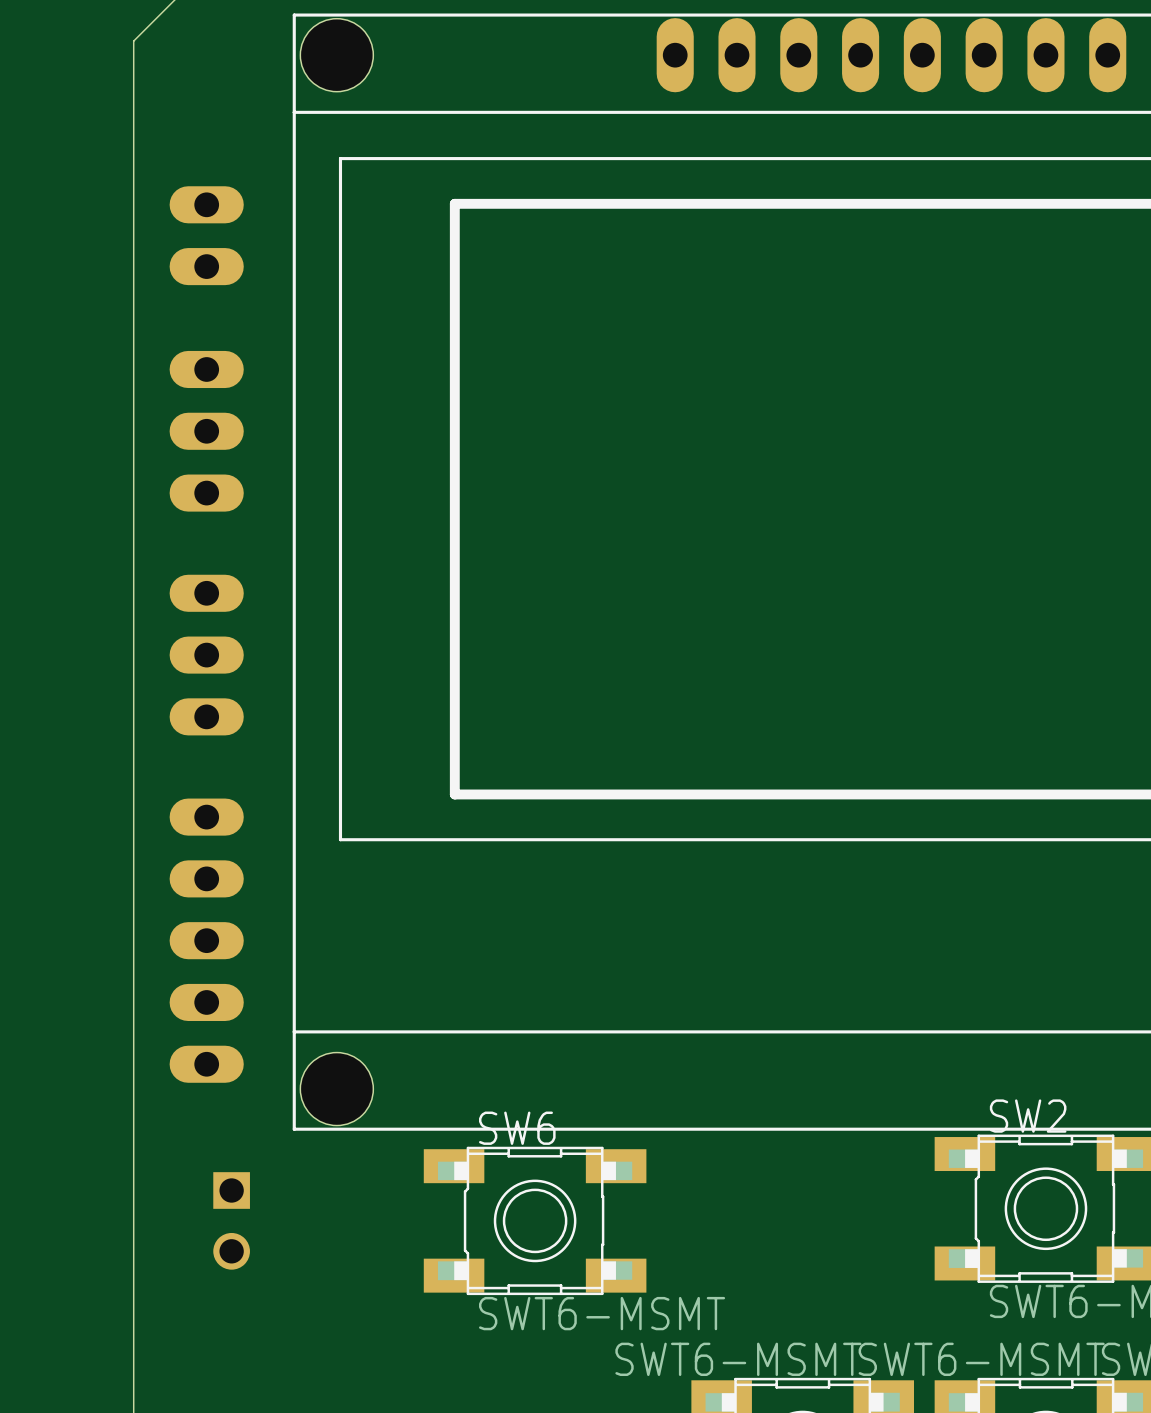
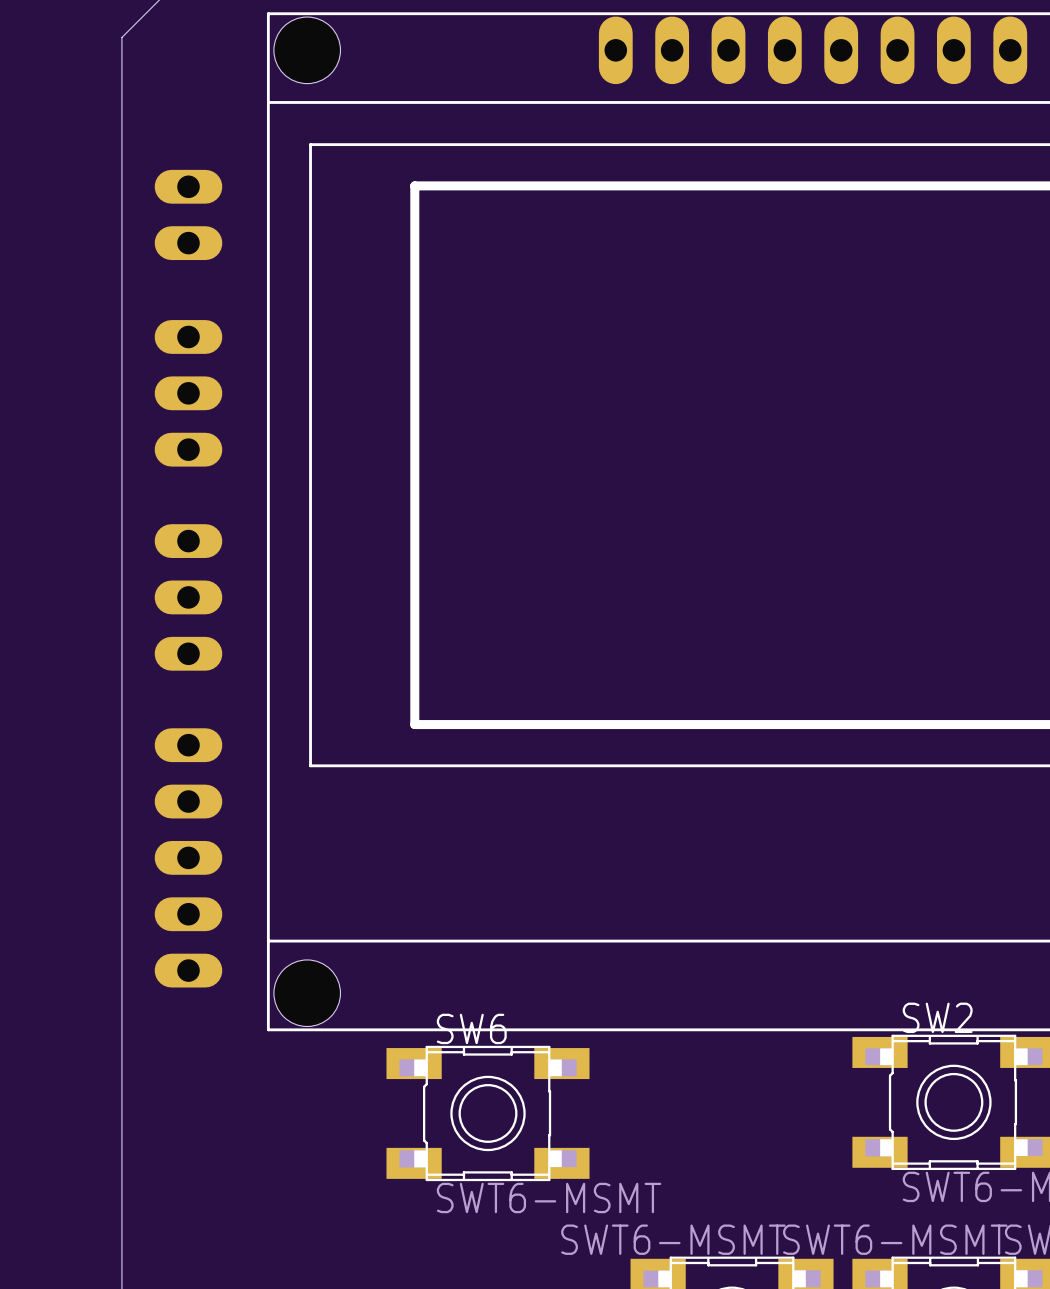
part: (231, 1220) -> none

